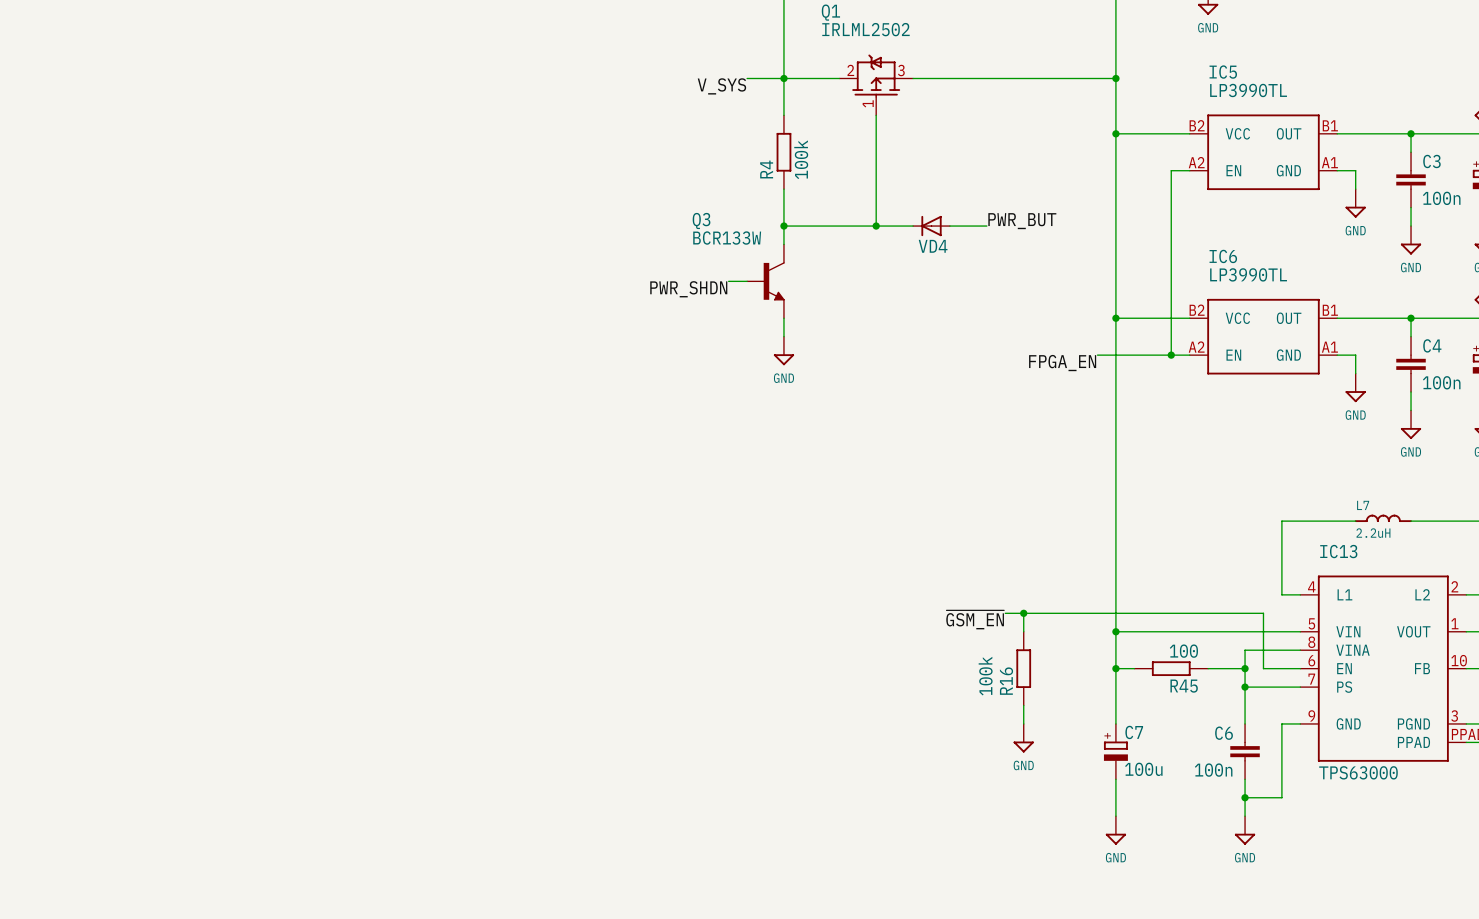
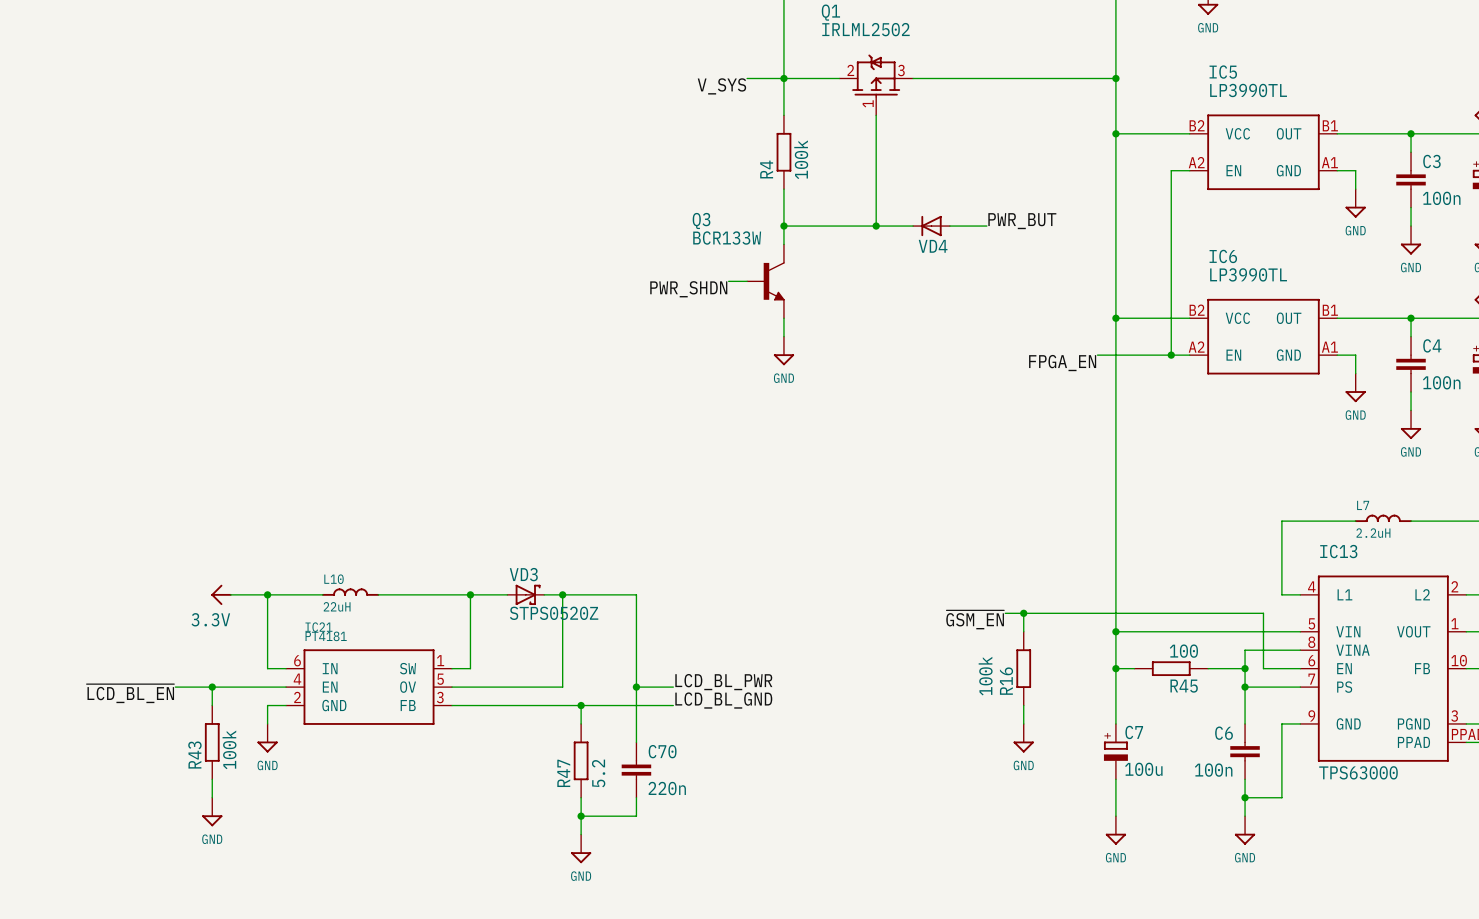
L10: none -> 22uH (350, 592)
power symbol: none -> 3.3V (221, 594)
wire: none -> (230, 594) (322, 594)
wire: none -> (267, 594) (267, 668) (286, 668)
junction: none -> (267, 594)
wire: none -> (378, 594) (507, 594)
wire: none -> (470, 594) (470, 668) (452, 668)
junction: none -> (470, 594)
VD3: none -> STPS0520Z (525, 594)
wire: none -> (544, 594) (636, 594) (636, 742)
wire: none -> (562, 594) (562, 687) (452, 687)
junction: none -> (562, 594)
label: none -> LCD_BL_PWR (723, 682)
wire: none -> (175, 687) (286, 687)
wire: none -> (212, 687) (212, 705)
junction: none -> (212, 687)
IC21: none -> PT4181 (369, 687)
wire: none -> (636, 687) (673, 687)
junction: none -> (636, 687)
label: none -> ~{LCD_BL_EN} (130, 693)
label: none -> LCD_BL_GND (723, 700)
wire: none -> (286, 705) (267, 705) (267, 723)
wire: none -> (452, 705) (673, 705)
wire: none -> (581, 705) (581, 723)
junction: none -> (581, 705)
power symbol: none -> GND (267, 738)
R43: none -> 100k (212, 742)
R47: none -> 5.2 (581, 760)
C70: none -> 220n (636, 770)
wire: none -> (212, 779) (212, 797)
wire: none -> (581, 797) (581, 834)
wire: none -> (636, 797) (636, 816) (581, 816)
power symbol: none -> GND (212, 812)
junction: none -> (581, 816)
power symbol: none -> GND (581, 848)

